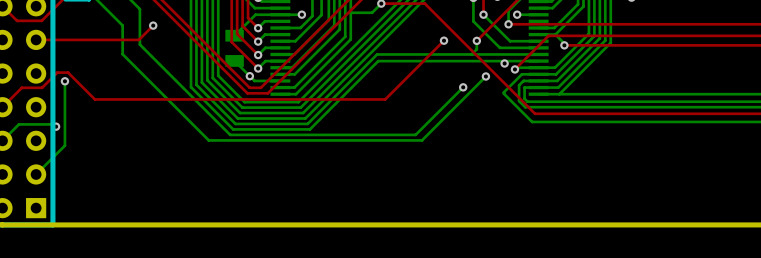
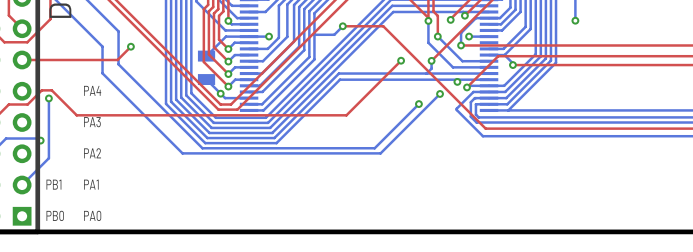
text: none -> PA4 (92, 90)
text: none -> PA3 (92, 122)
text: none -> PA2 (92, 153)
text: none -> PB1 (53, 184)
text: none -> PA1 (91, 184)
text: none -> PB0 (55, 215)
text: none -> PA0 (92, 215)

